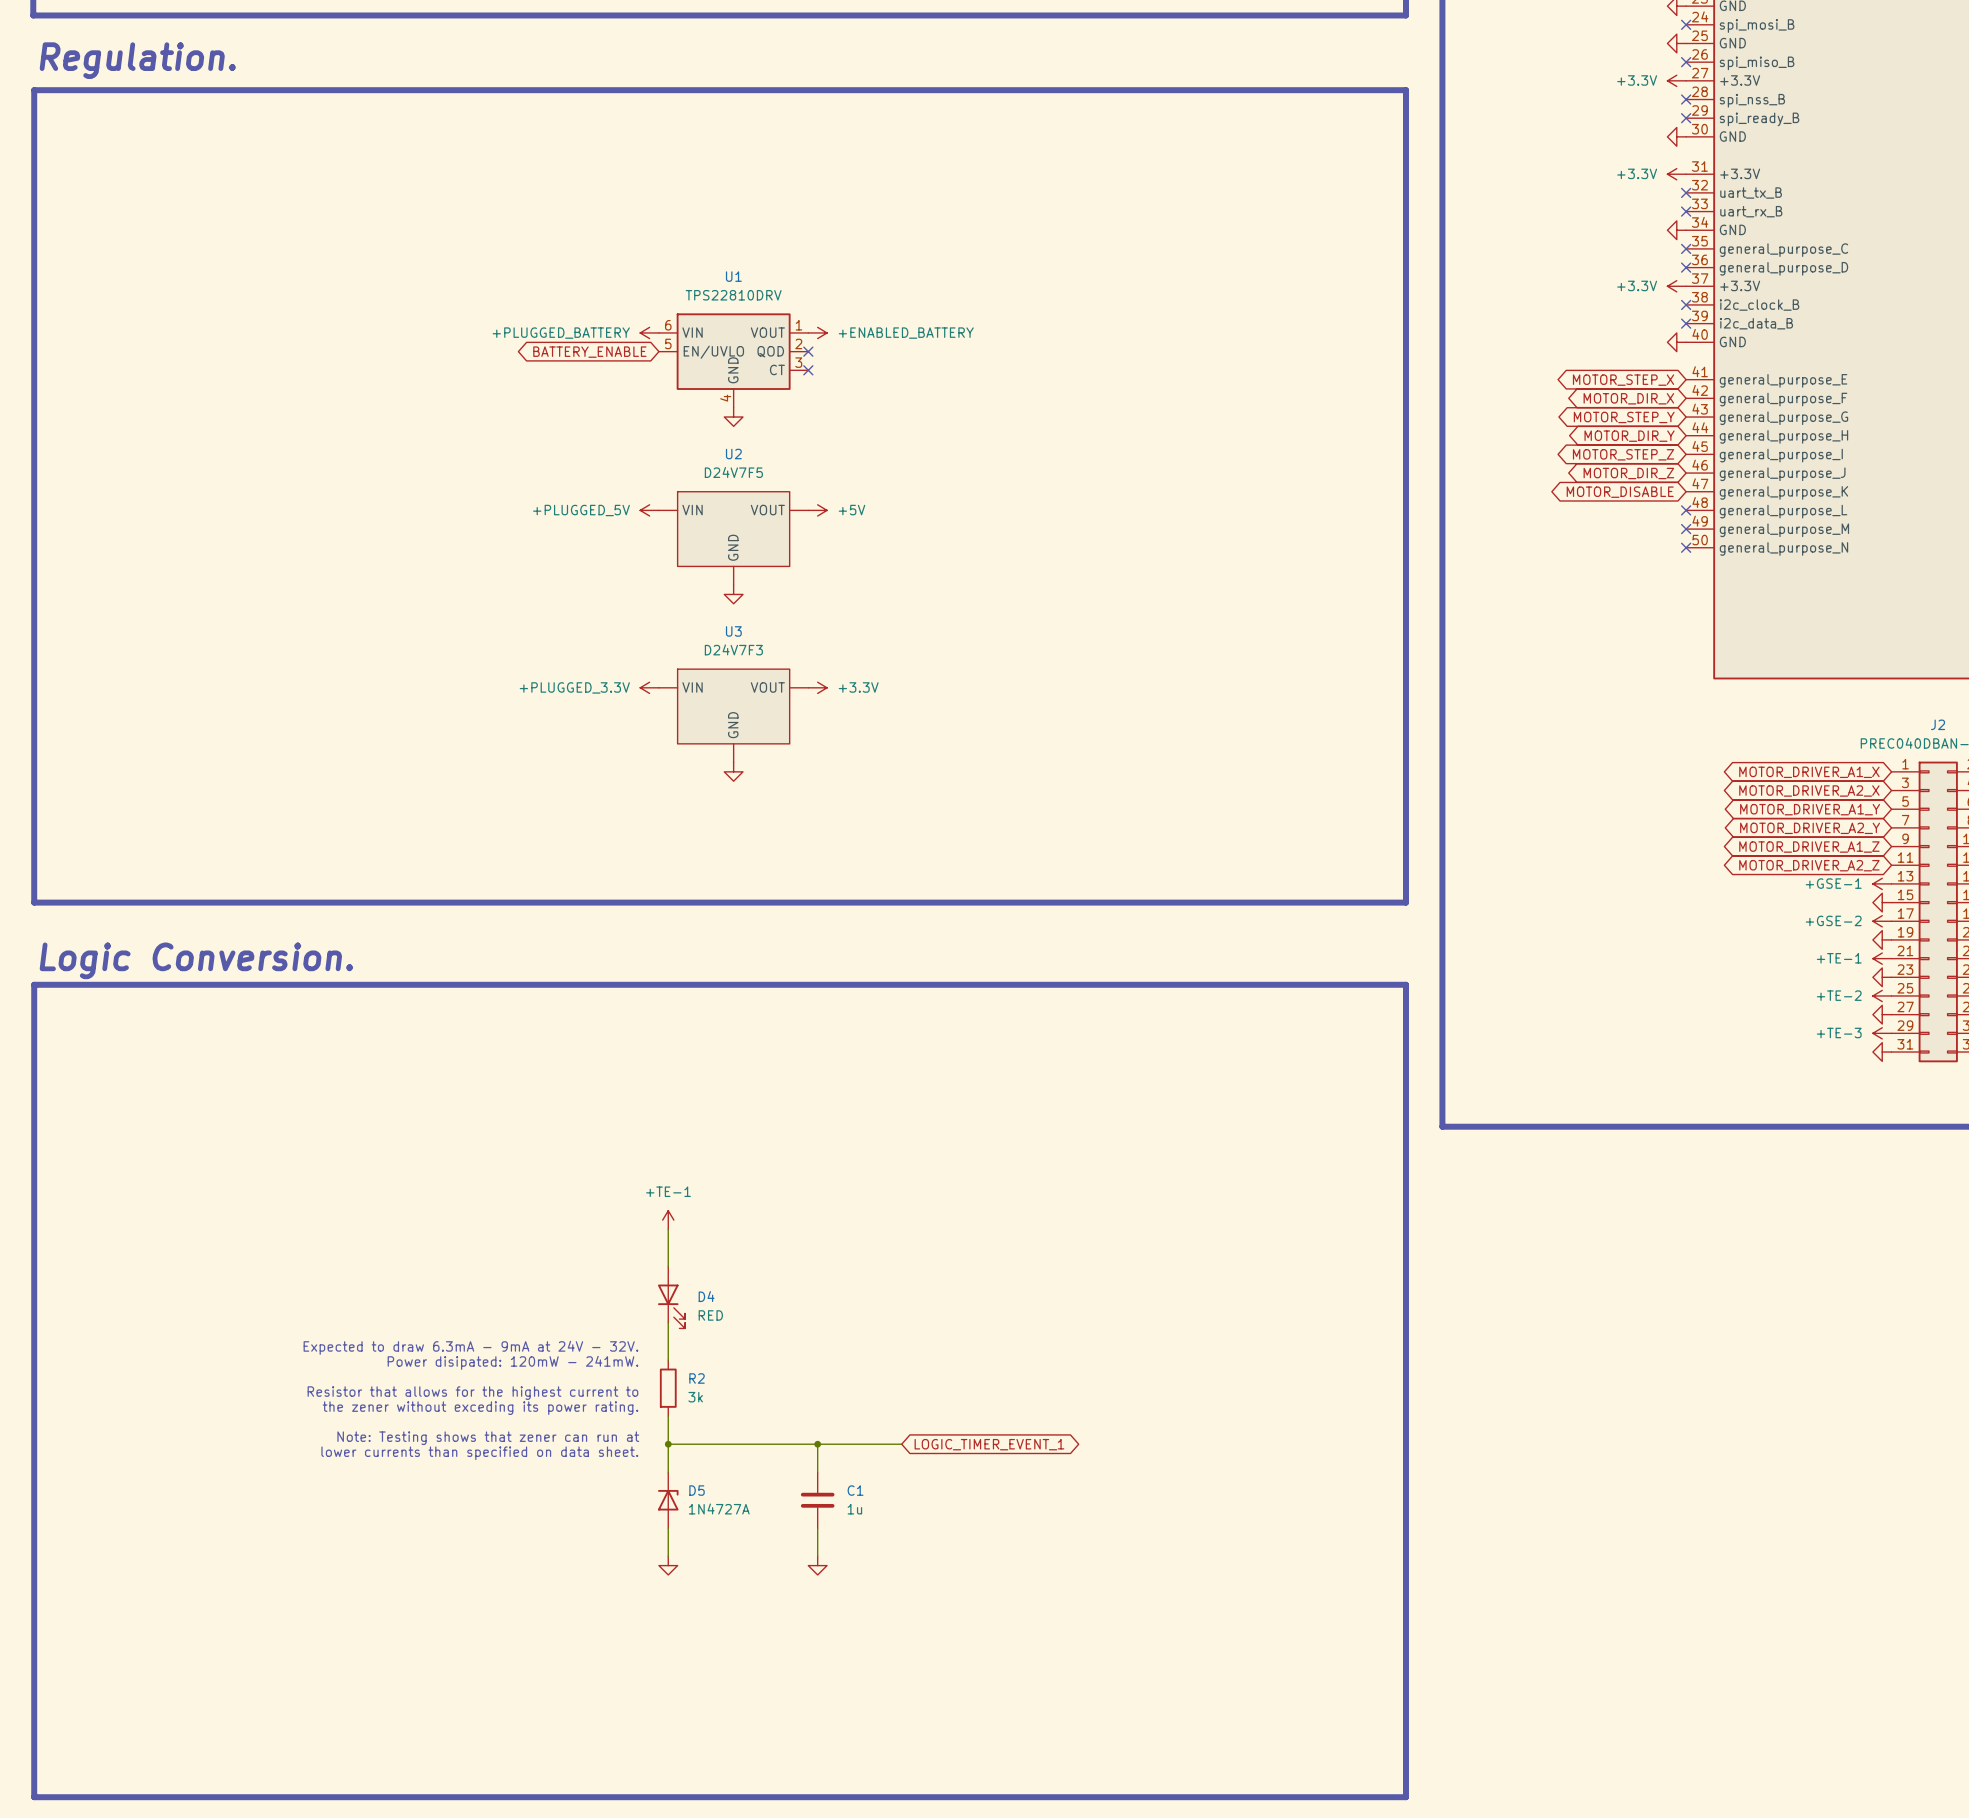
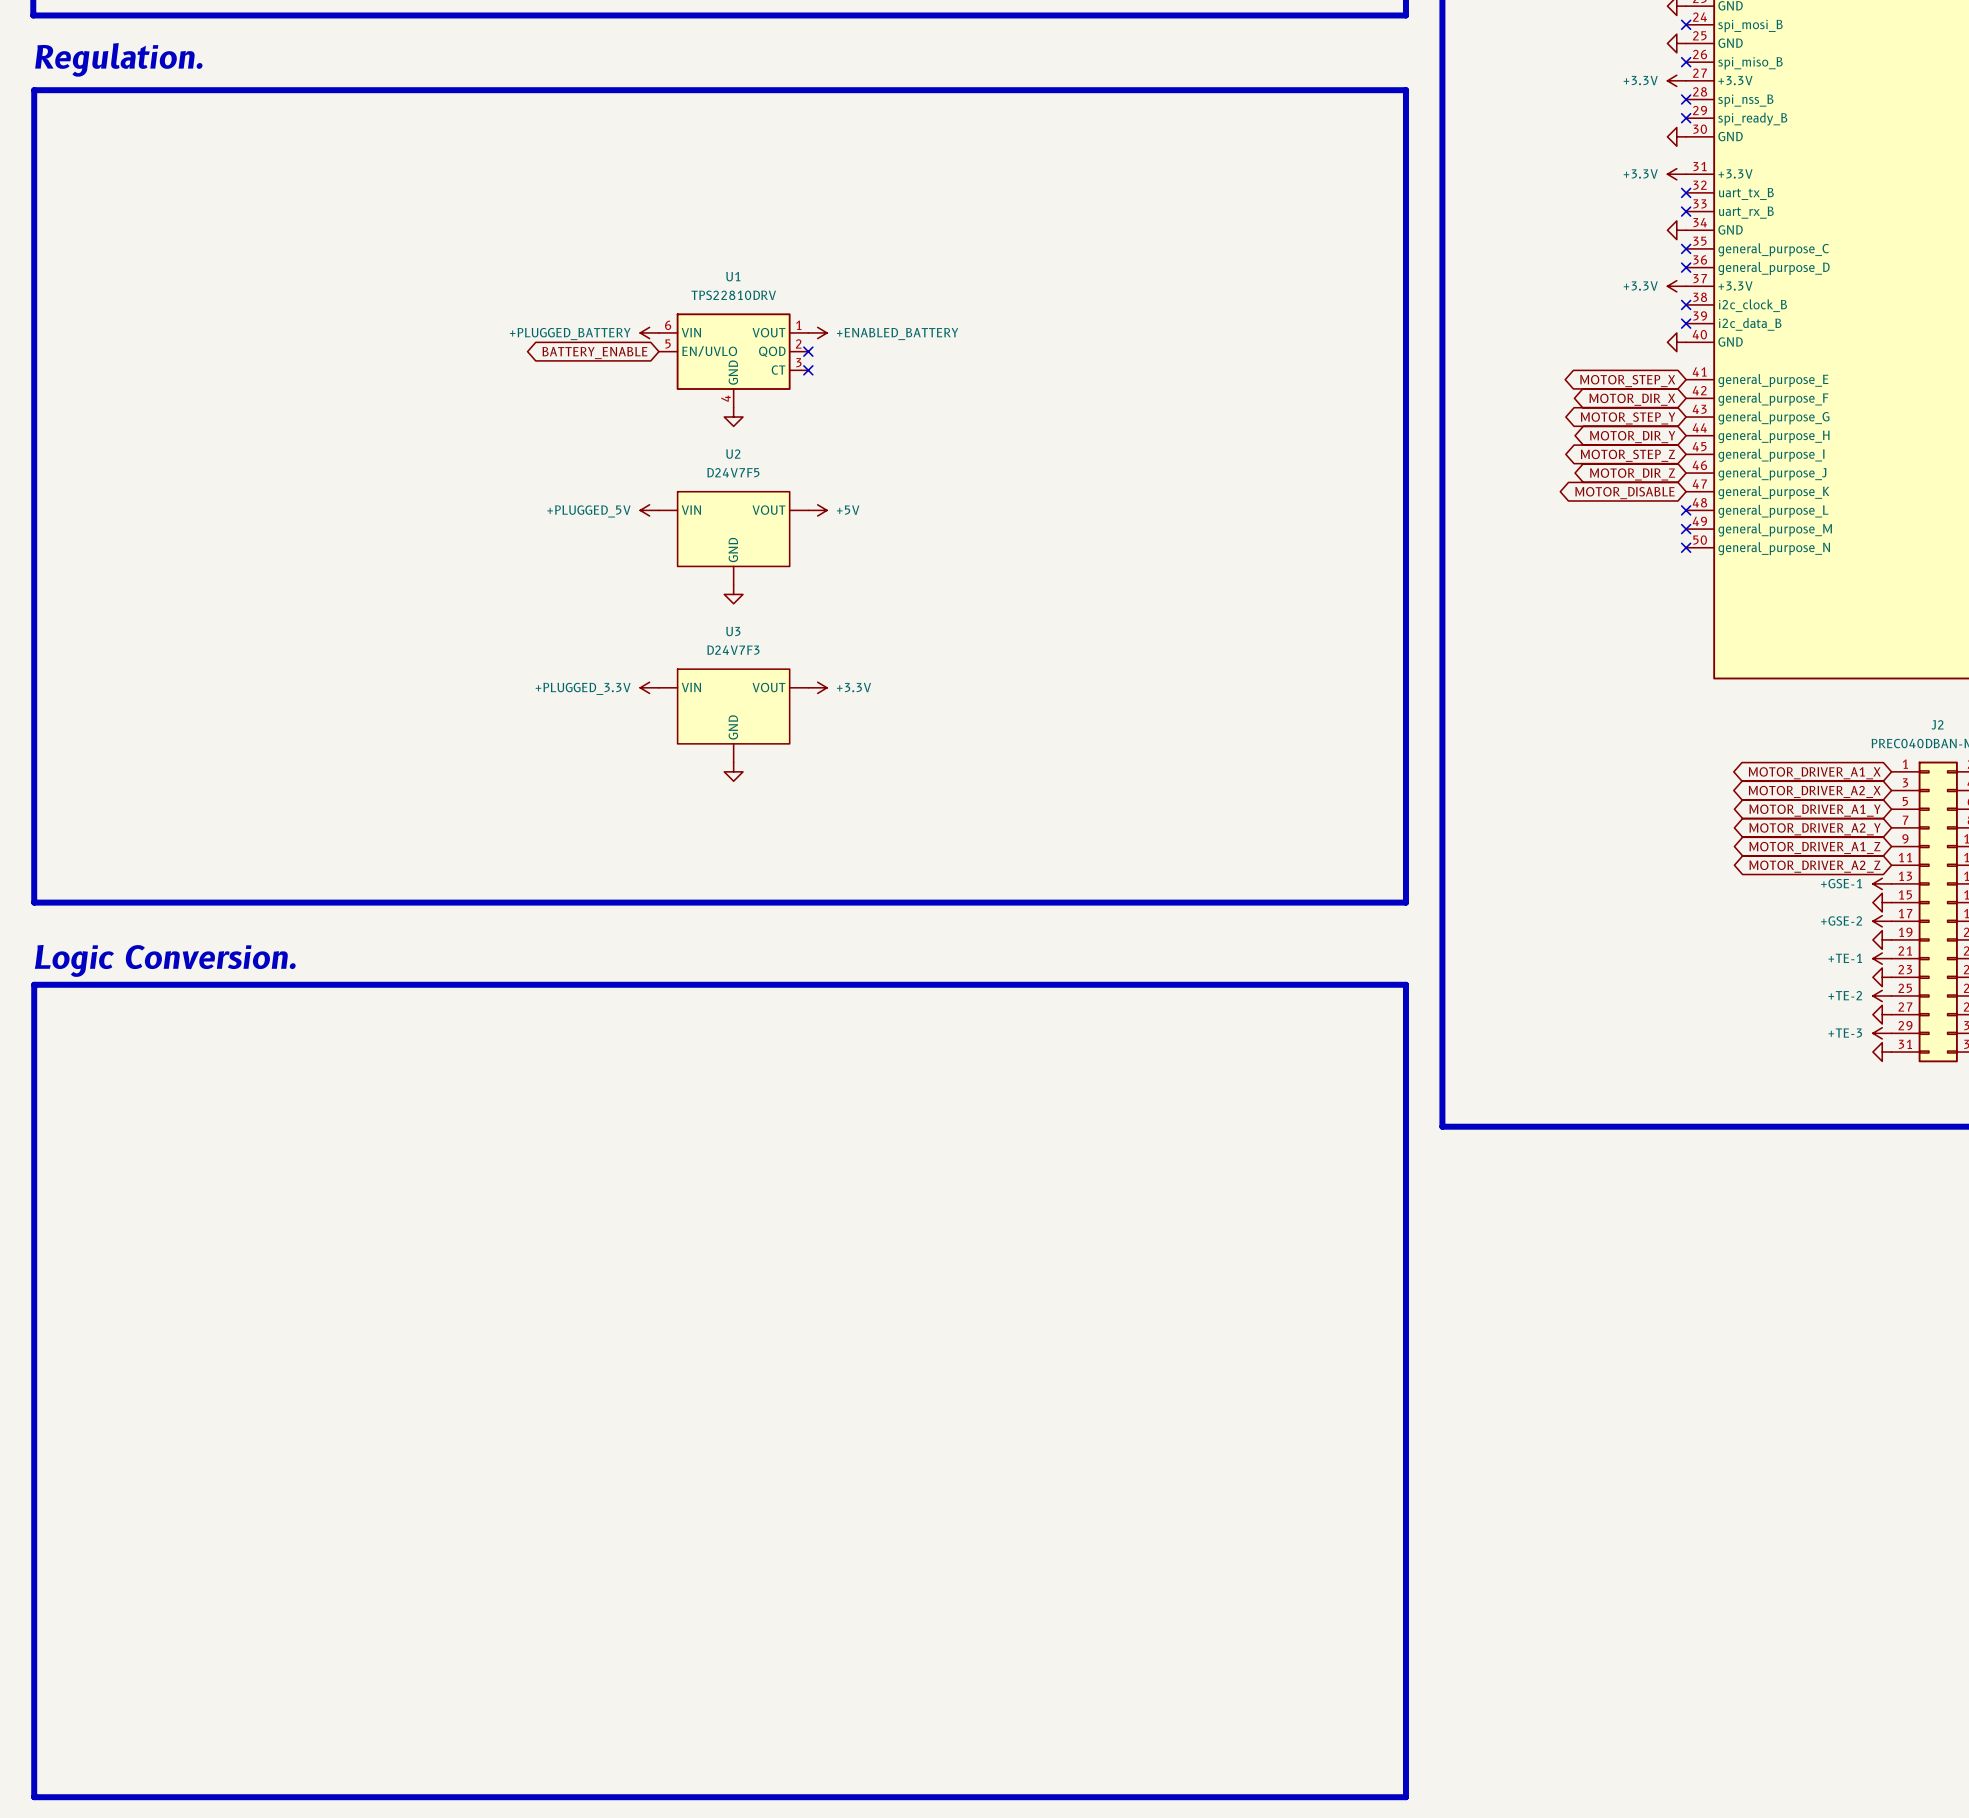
power symbol: +TE-1 (668, 1220) -> none
wire: (668, 1229) (668, 1266) -> none
D4: RED (671, 1297) -> none
wire: (668, 1322) (668, 1360) -> none
text: Expected to draw 6.3mA - 9mA at 24V - 32V. (470, 1347) -> none
text: Power disipated: 120mW - 241mW. (512, 1362) -> none
R2: 3k (668, 1388) -> none
text: Resistor that allows for the highest current to (472, 1393) -> none
text: the zener without exceding its power rating. (480, 1408) -> none
wire: (668, 1416) (668, 1472) -> none
text: Note: Testing shows that zener can run at (488, 1438) -> none
wire: (668, 1444) (901, 1444) -> none
junction: (668, 1444) -> none
wire: (817, 1444) (817, 1472) -> none
junction: (817, 1444) -> none
global label: LOGIC_TIMER_EVENT_1 (989, 1444) -> none
text: lower currents than specified on data sheet. (479, 1453) -> none
D5: 1N4727A (668, 1500) -> none
C1: 1u (817, 1500) -> none
wire: (668, 1528) (668, 1556) -> none
wire: (817, 1528) (817, 1556) -> none
power symbol: (668, 1565) -> none
power symbol: (817, 1565) -> none

